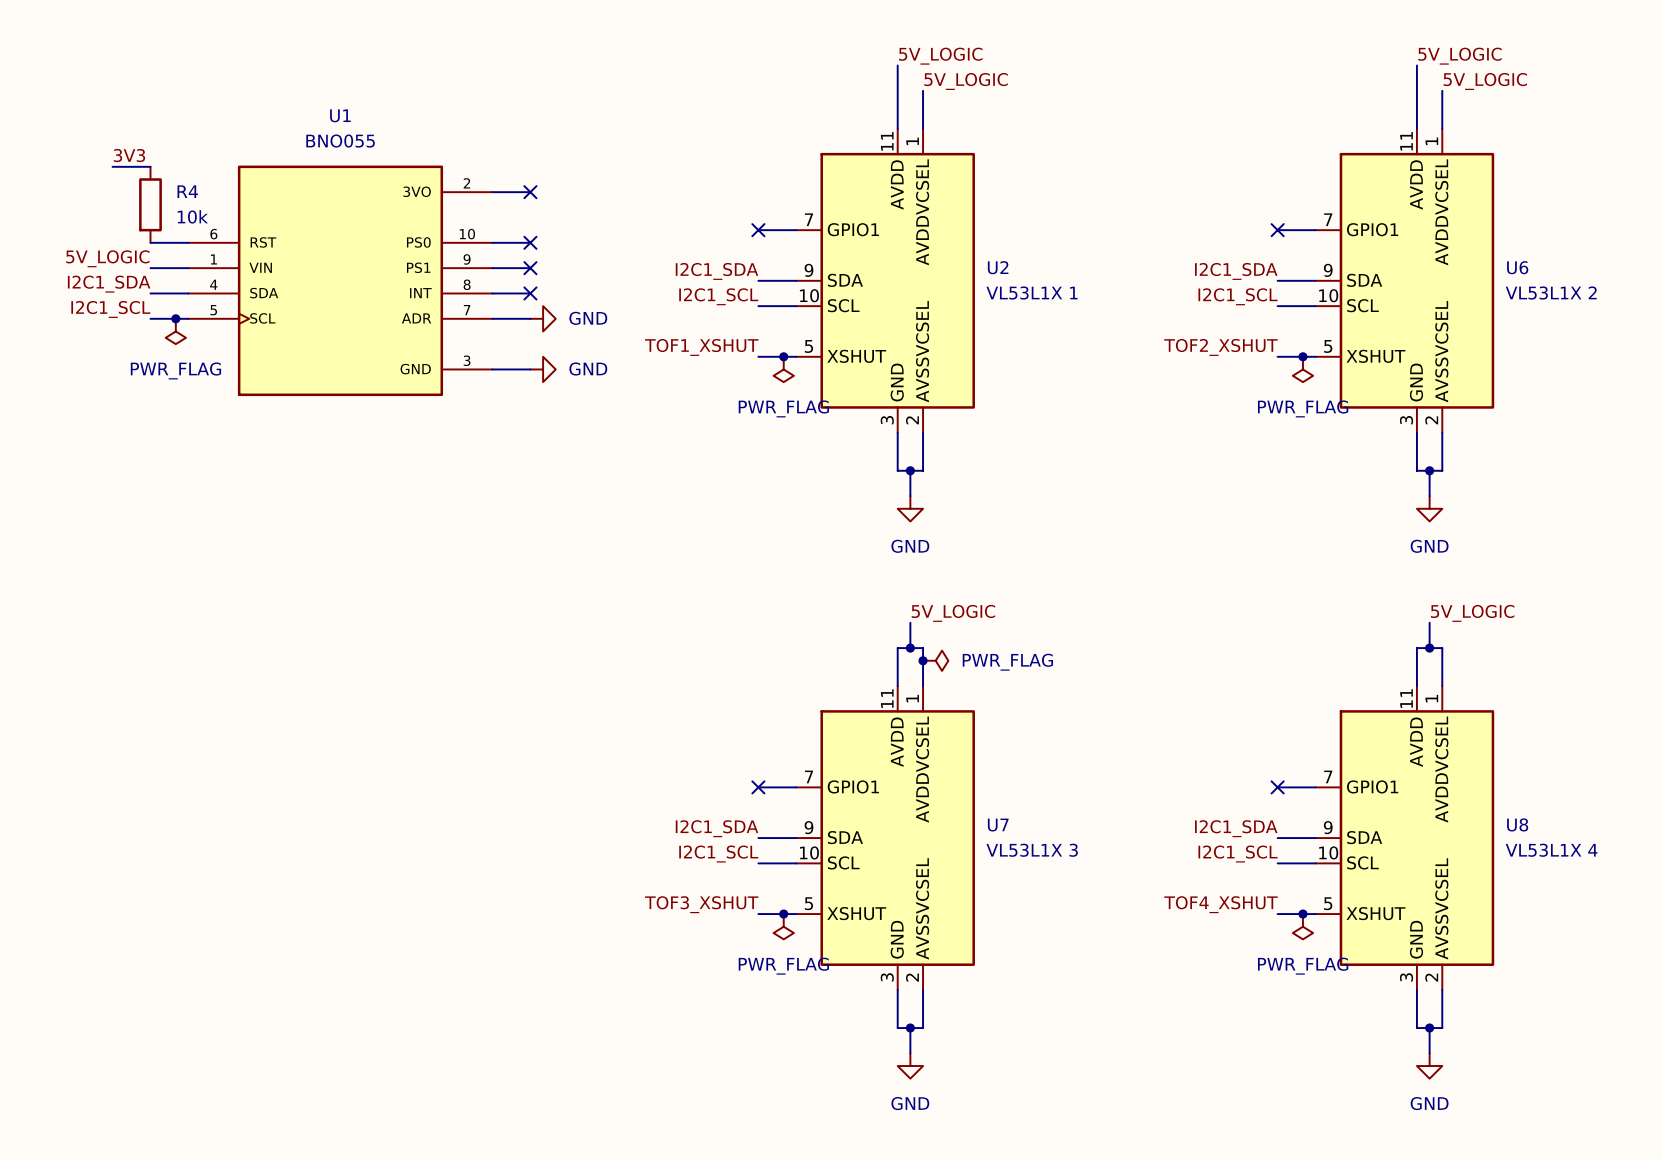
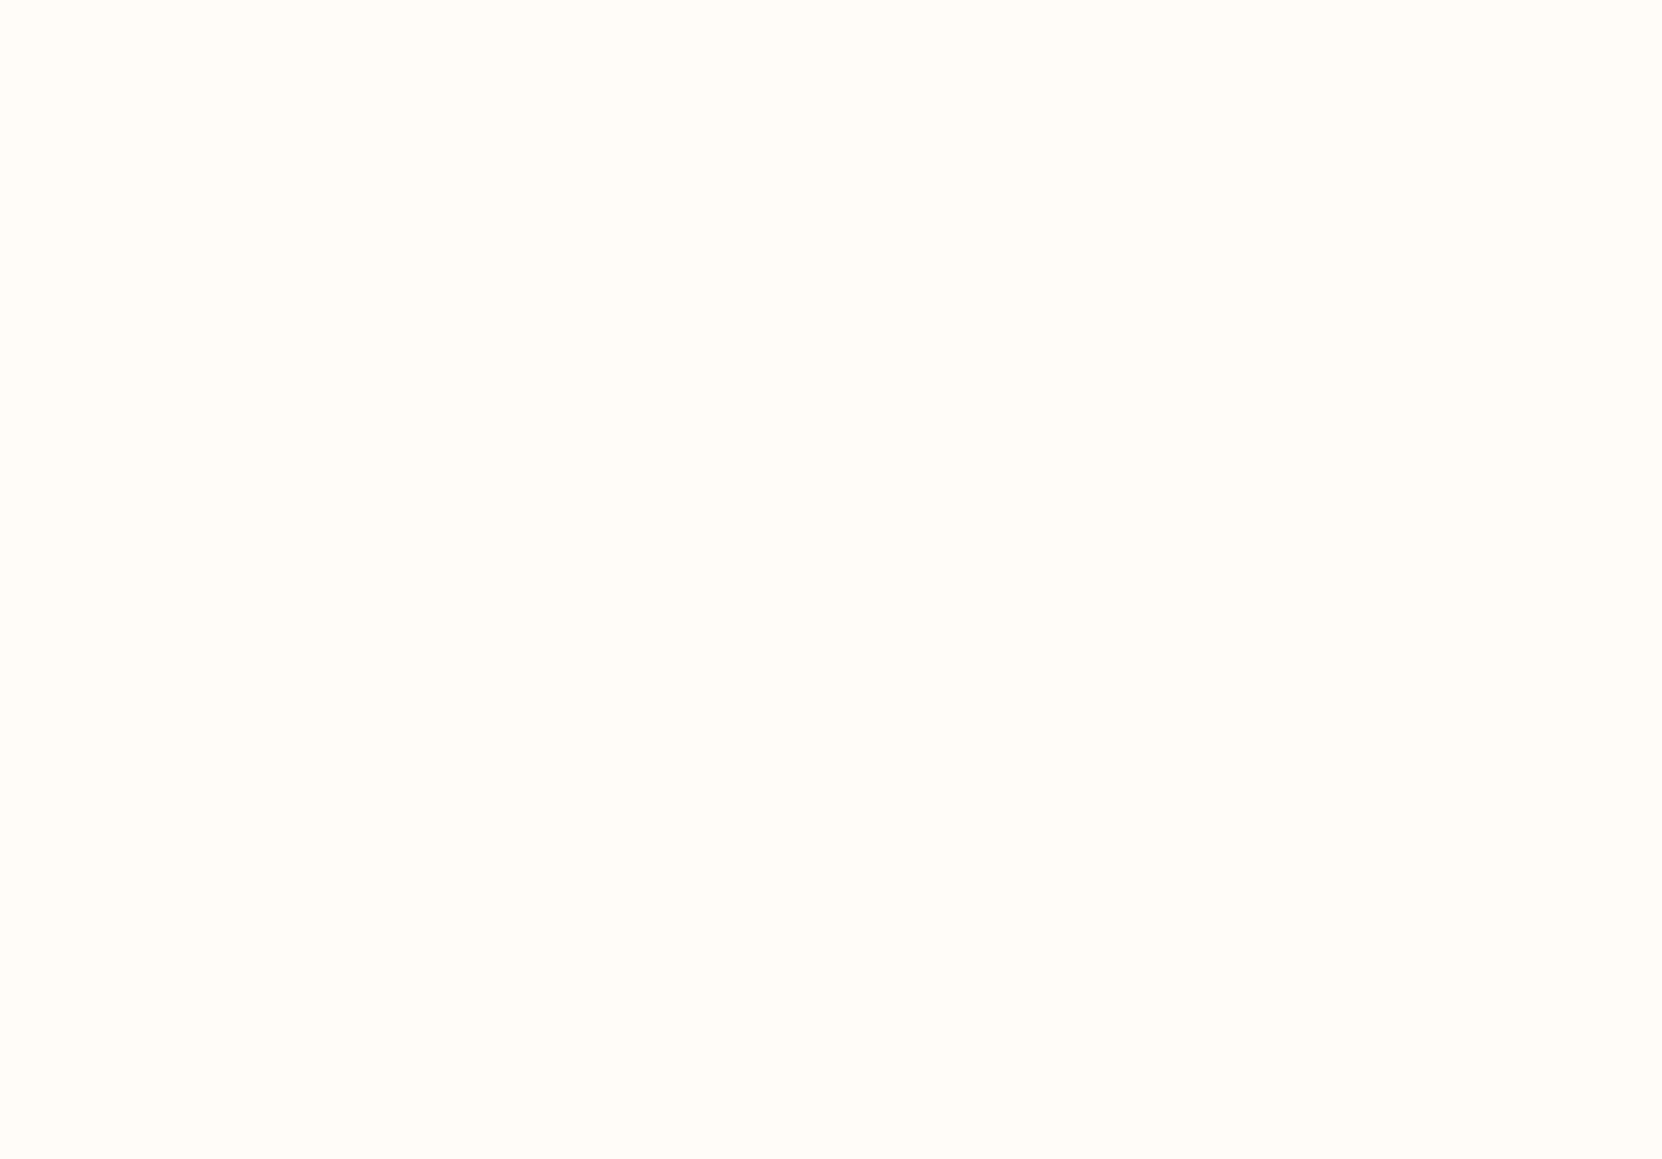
label: 5V_LOGIC (940, 56) -> none
label: 5V_LOGIC (1459, 56) -> none
wire: (897, 65) (897, 128) -> none
wire: (1416, 65) (1416, 128) -> none
label: 5V_LOGIC (966, 81) -> none
label: 5V_LOGIC (1485, 81) -> none
wire: (923, 90) (923, 128) -> none
wire: (1442, 90) (1442, 128) -> none
label: 3V3 (129, 155) -> none
wire: (112, 166) (150, 166) -> none
wire: (492, 192) (530, 192) -> none
no-connect mark: (530, 192) -> none
R4: 10k (150, 204) -> none
wire: (758, 230) (796, 230) -> none
no-connect mark: (758, 230) -> none
wire: (1277, 230) (1315, 230) -> none
no-connect mark: (1277, 230) -> none
wire: (150, 242) (188, 242) -> none
wire: (492, 242) (530, 242) -> none
no-connect mark: (530, 242) -> none
label: 5V_LOGIC (107, 258) -> none
wire: (150, 268) (188, 268) -> none
wire: (492, 268) (530, 268) -> none
no-connect mark: (530, 268) -> none
label: I2C1_SDA (717, 271) -> none
label: I2C1_SDA (1236, 271) -> none
U1: BNO055 (340, 280) -> none
wire: (758, 280) (796, 280) -> none
U2: VL53L1X 1 (885, 280) -> none
wire: (1277, 280) (1315, 280) -> none
U6: VL53L1X 2 (1404, 280) -> none
label: I2C1_SDA (109, 284) -> none
wire: (150, 293) (188, 293) -> none
wire: (492, 293) (530, 293) -> none
no-connect mark: (530, 293) -> none
label: I2C1_SCL (718, 296) -> none
label: I2C1_SCL (1238, 296) -> none
wire: (758, 306) (796, 306) -> none
wire: (1277, 306) (1315, 306) -> none
label: I2C1_SCL (110, 309) -> none
wire: (150, 318) (188, 318) -> none
junction: (175, 318) -> none
wire: (492, 318) (530, 318) -> none
power symbol: GND (543, 318) -> none
power symbol: PWR_FLAG (175, 331) -> none
label: TOF1_XSHUT (701, 347) -> none
label: TOF2_XSHUT (1220, 347) -> none
wire: (758, 356) (796, 356) -> none
junction: (783, 356) -> none
wire: (1277, 356) (1315, 356) -> none
junction: (1302, 356) -> none
wire: (492, 369) (530, 369) -> none
power symbol: GND (543, 369) -> none
power symbol: PWR_FLAG (783, 369) -> none
power symbol: PWR_FLAG (1302, 369) -> none
wire: (897, 432) (897, 470) (923, 470) (923, 432) -> none
wire: (1416, 432) (1416, 470) (1442, 470) (1442, 432) -> none
wire: (910, 470) (910, 496) -> none
junction: (910, 470) -> none
wire: (1429, 470) (1429, 496) -> none
junction: (1429, 470) -> none
power symbol: GND (910, 508) -> none
power symbol: GND (1429, 508) -> none
label: 5V_LOGIC (953, 613) -> none
label: 5V_LOGIC (1472, 613) -> none
wire: (910, 622) (910, 648) -> none
wire: (1429, 622) (1429, 648) -> none
junction: (910, 648) -> none
junction: (1429, 648) -> none
junction: (923, 660) -> none
power symbol: PWR_FLAG (935, 660) -> none
wire: (897, 686) (897, 648) (923, 648) (923, 686) -> none
wire: (1416, 686) (1416, 648) (1442, 648) (1442, 686) -> none
wire: (758, 787) (796, 787) -> none
no-connect mark: (758, 787) -> none
wire: (1277, 787) (1315, 787) -> none
no-connect mark: (1277, 787) -> none
label: I2C1_SDA (717, 828) -> none
label: I2C1_SDA (1236, 828) -> none
wire: (758, 838) (796, 838) -> none
U7: VL53L1X 3 (885, 838) -> none
wire: (1277, 838) (1315, 838) -> none
U8: VL53L1X 4 (1404, 838) -> none
label: I2C1_SCL (718, 854) -> none
label: I2C1_SCL (1238, 854) -> none
wire: (758, 863) (796, 863) -> none
wire: (1277, 863) (1315, 863) -> none
label: TOF3_XSHUT (701, 904) -> none
label: TOF4_XSHUT (1220, 904) -> none
wire: (758, 914) (796, 914) -> none
junction: (783, 914) -> none
wire: (1277, 914) (1315, 914) -> none
junction: (1302, 914) -> none
power symbol: PWR_FLAG (783, 926) -> none
power symbol: PWR_FLAG (1302, 926) -> none
wire: (897, 990) (897, 1028) (923, 1028) (923, 990) -> none
wire: (1416, 990) (1416, 1028) (1442, 1028) (1442, 990) -> none
wire: (910, 1028) (910, 1053) -> none
junction: (910, 1028) -> none
wire: (1429, 1028) (1429, 1053) -> none
junction: (1429, 1028) -> none
power symbol: GND (910, 1066) -> none
power symbol: GND (1429, 1066) -> none

